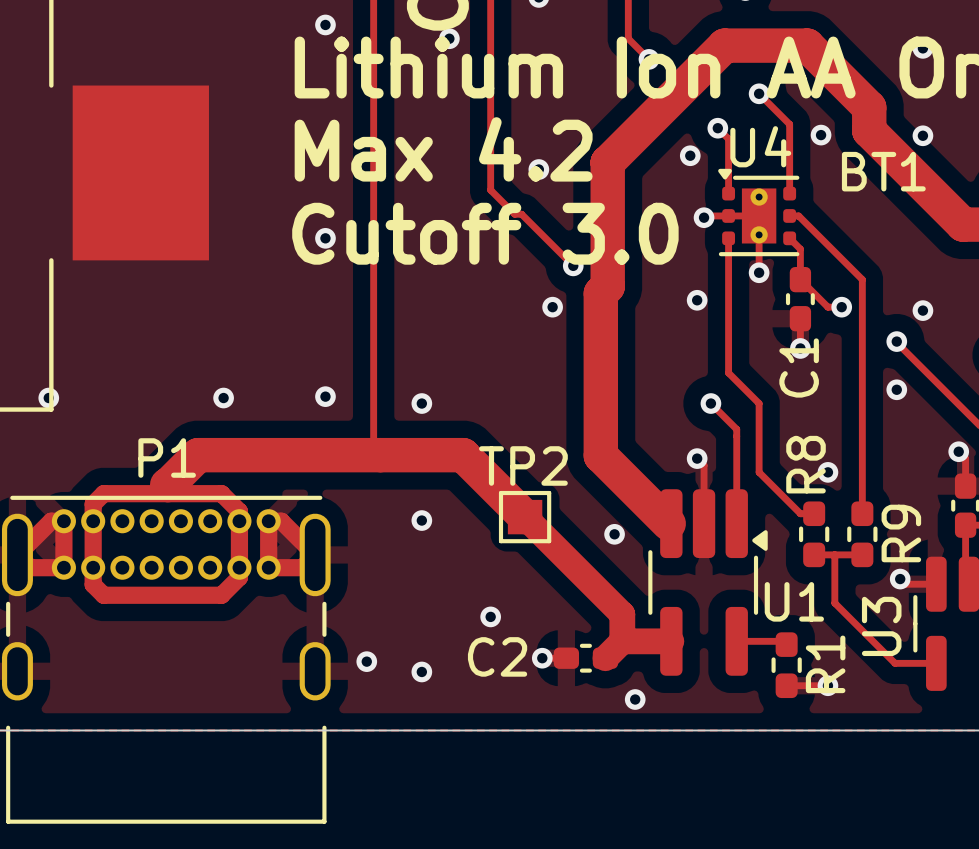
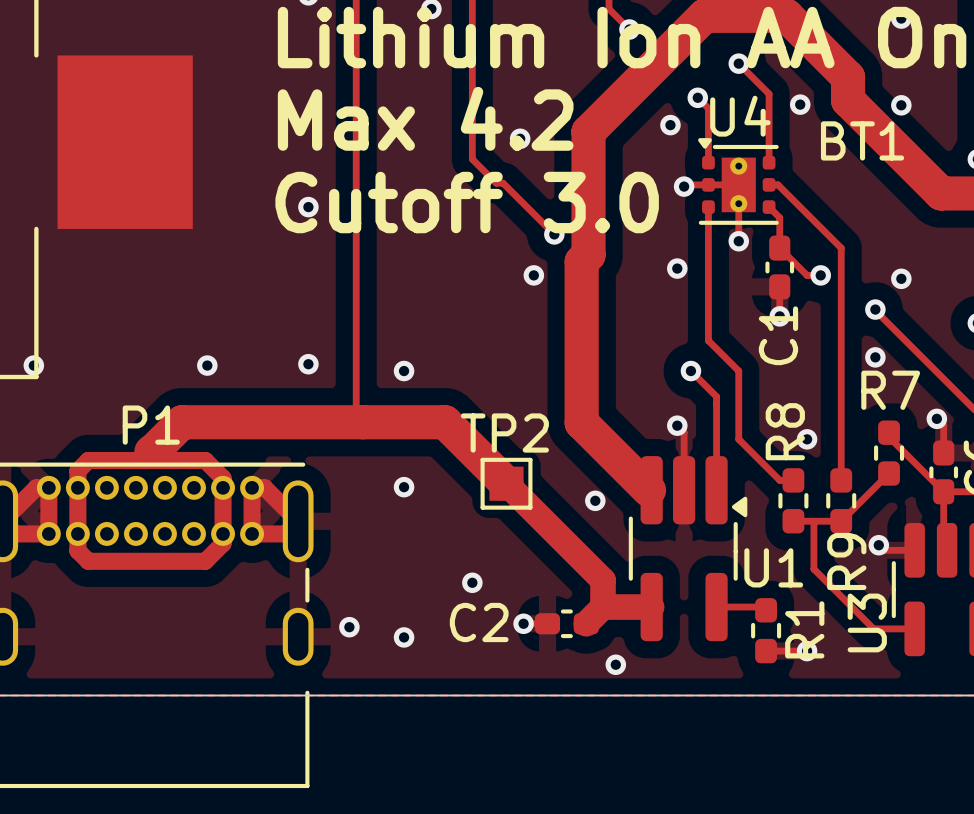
track: none -> (889, 432) (889, 437) (943, 491)
R7: none -> (889, 453)
track: none -> (889, 473) (841, 521)
R9 name position: R9 (901, 533) -> R9 (846, 561)
U3 name position: U3 (881, 626) -> U3 (867, 622)

